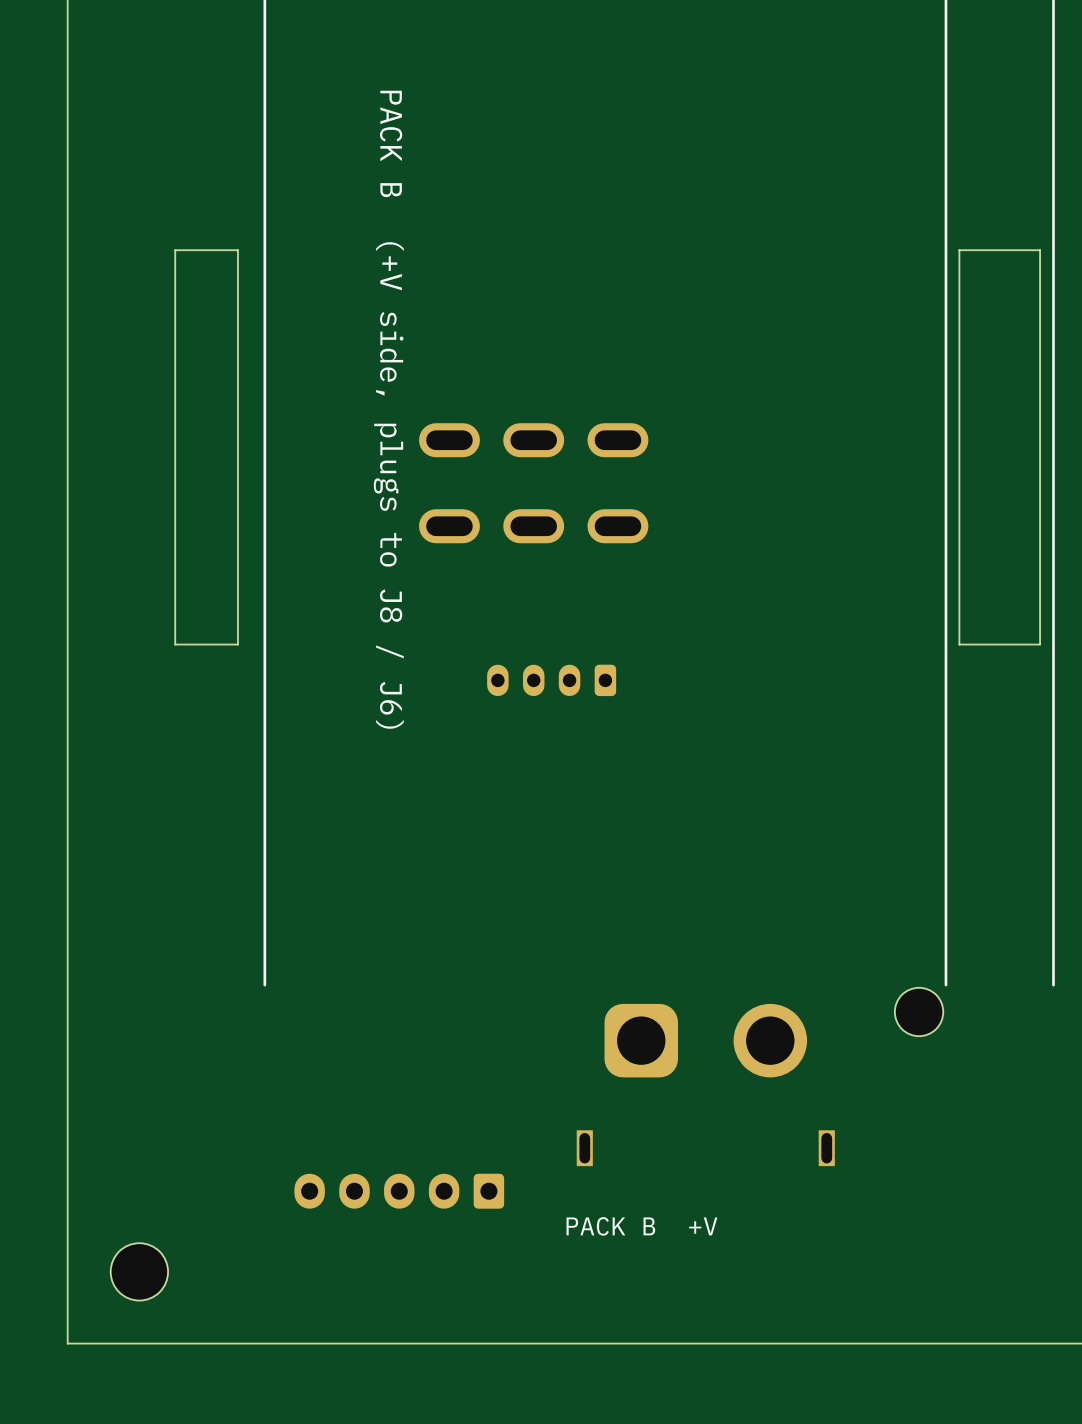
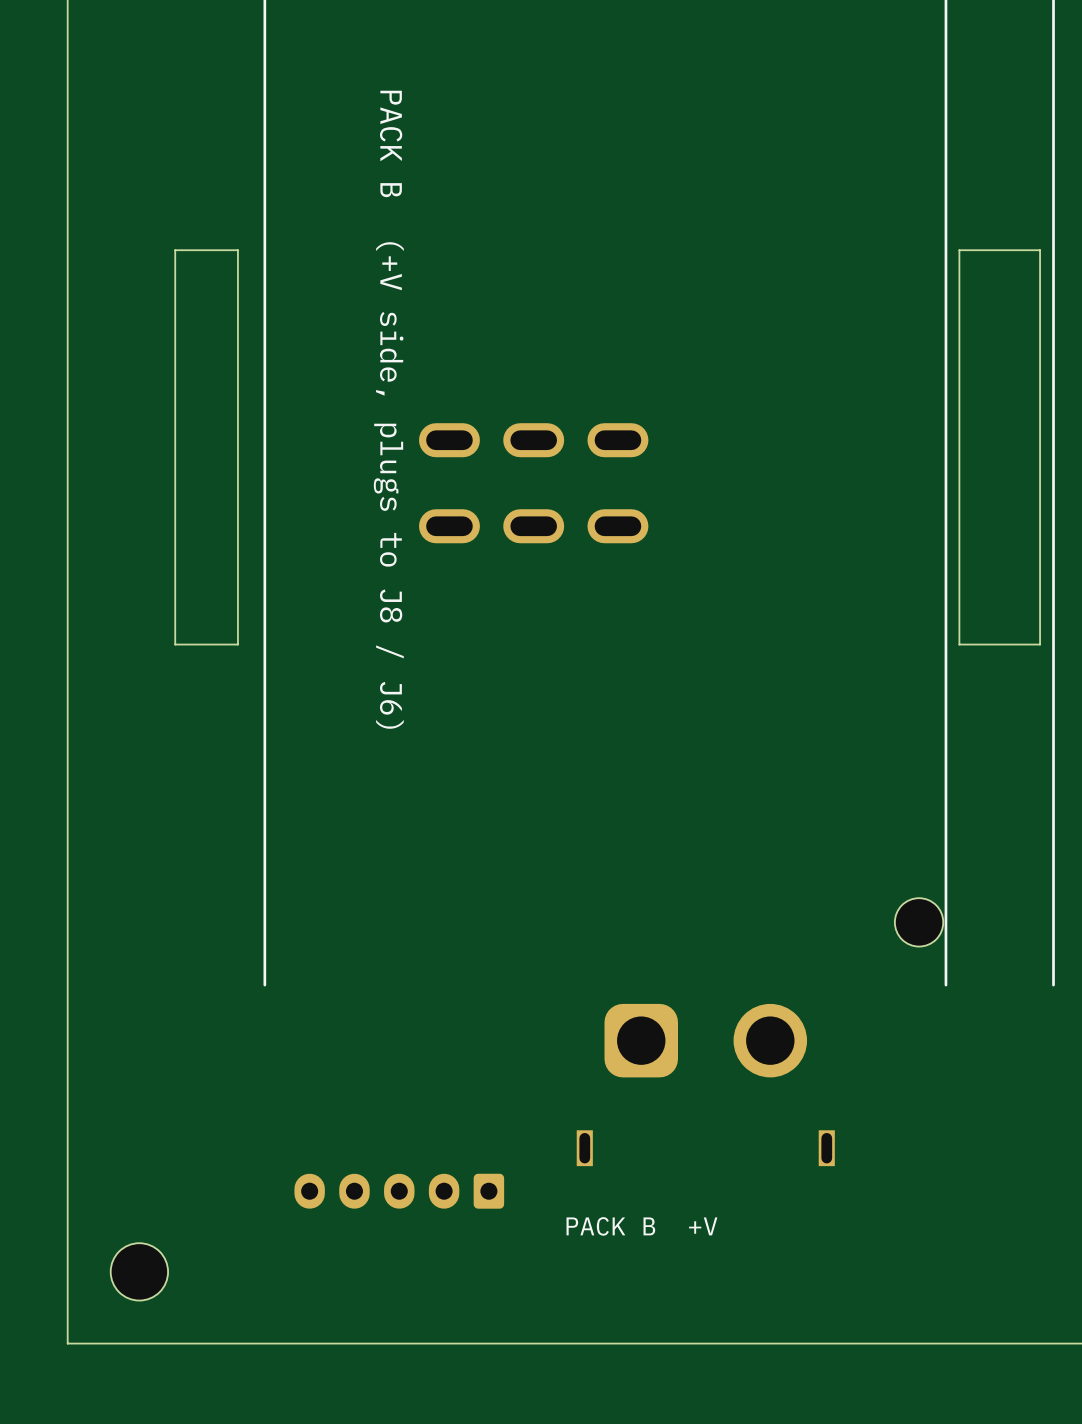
part: (551, 680) -> none
part position: (919, 1011) -> (919, 922)

